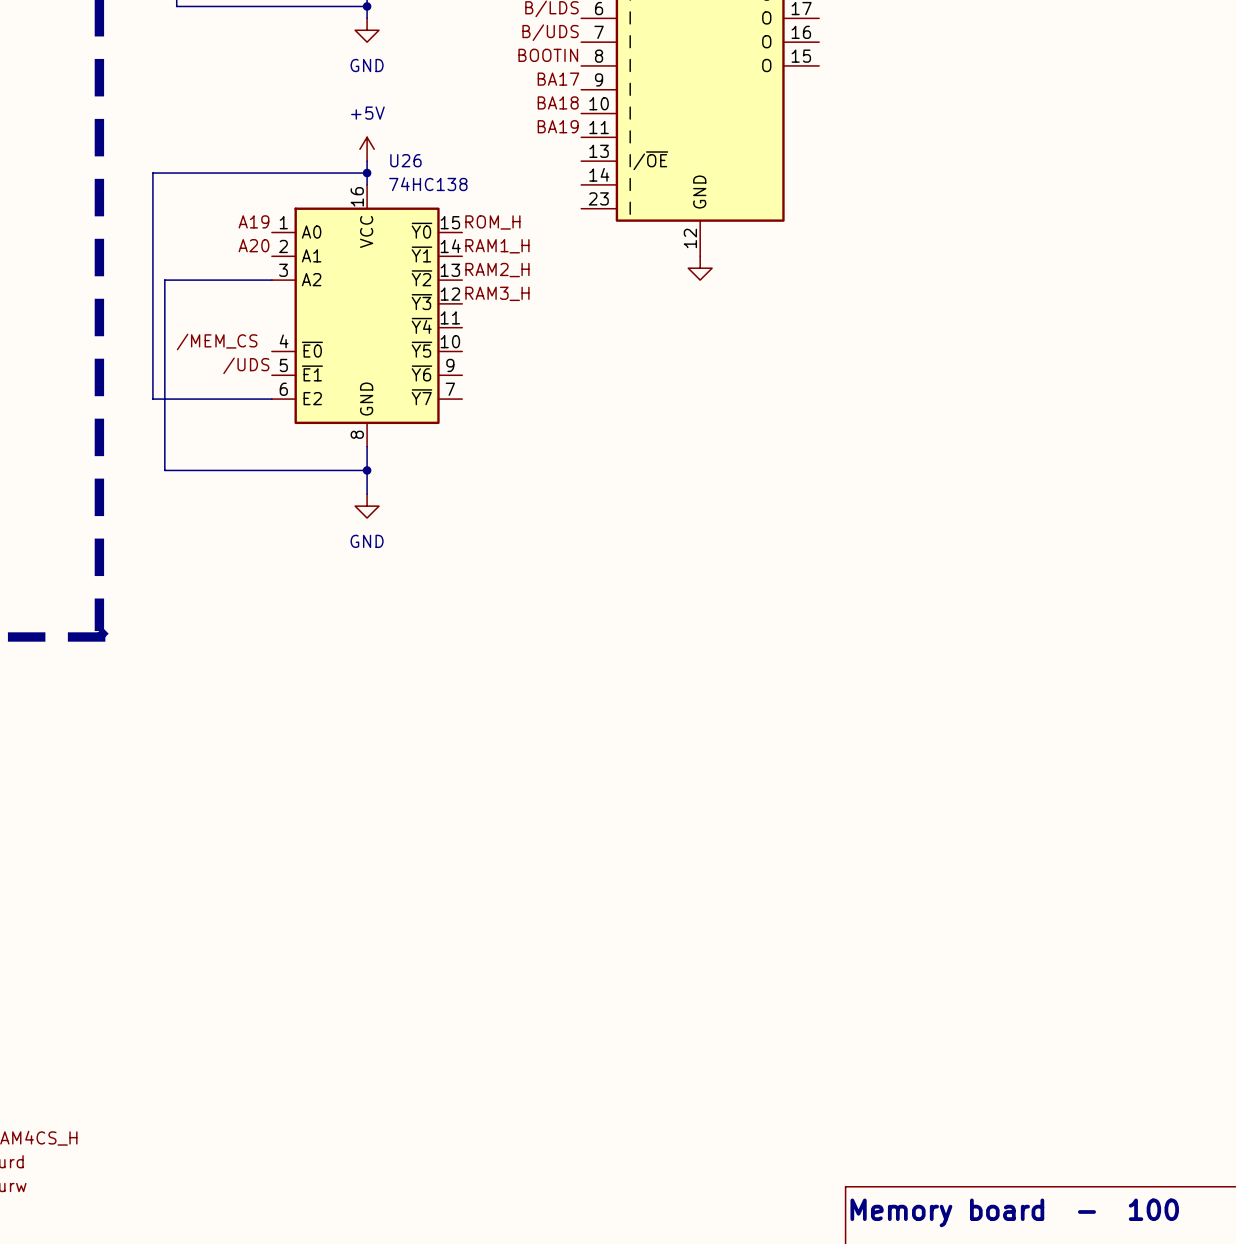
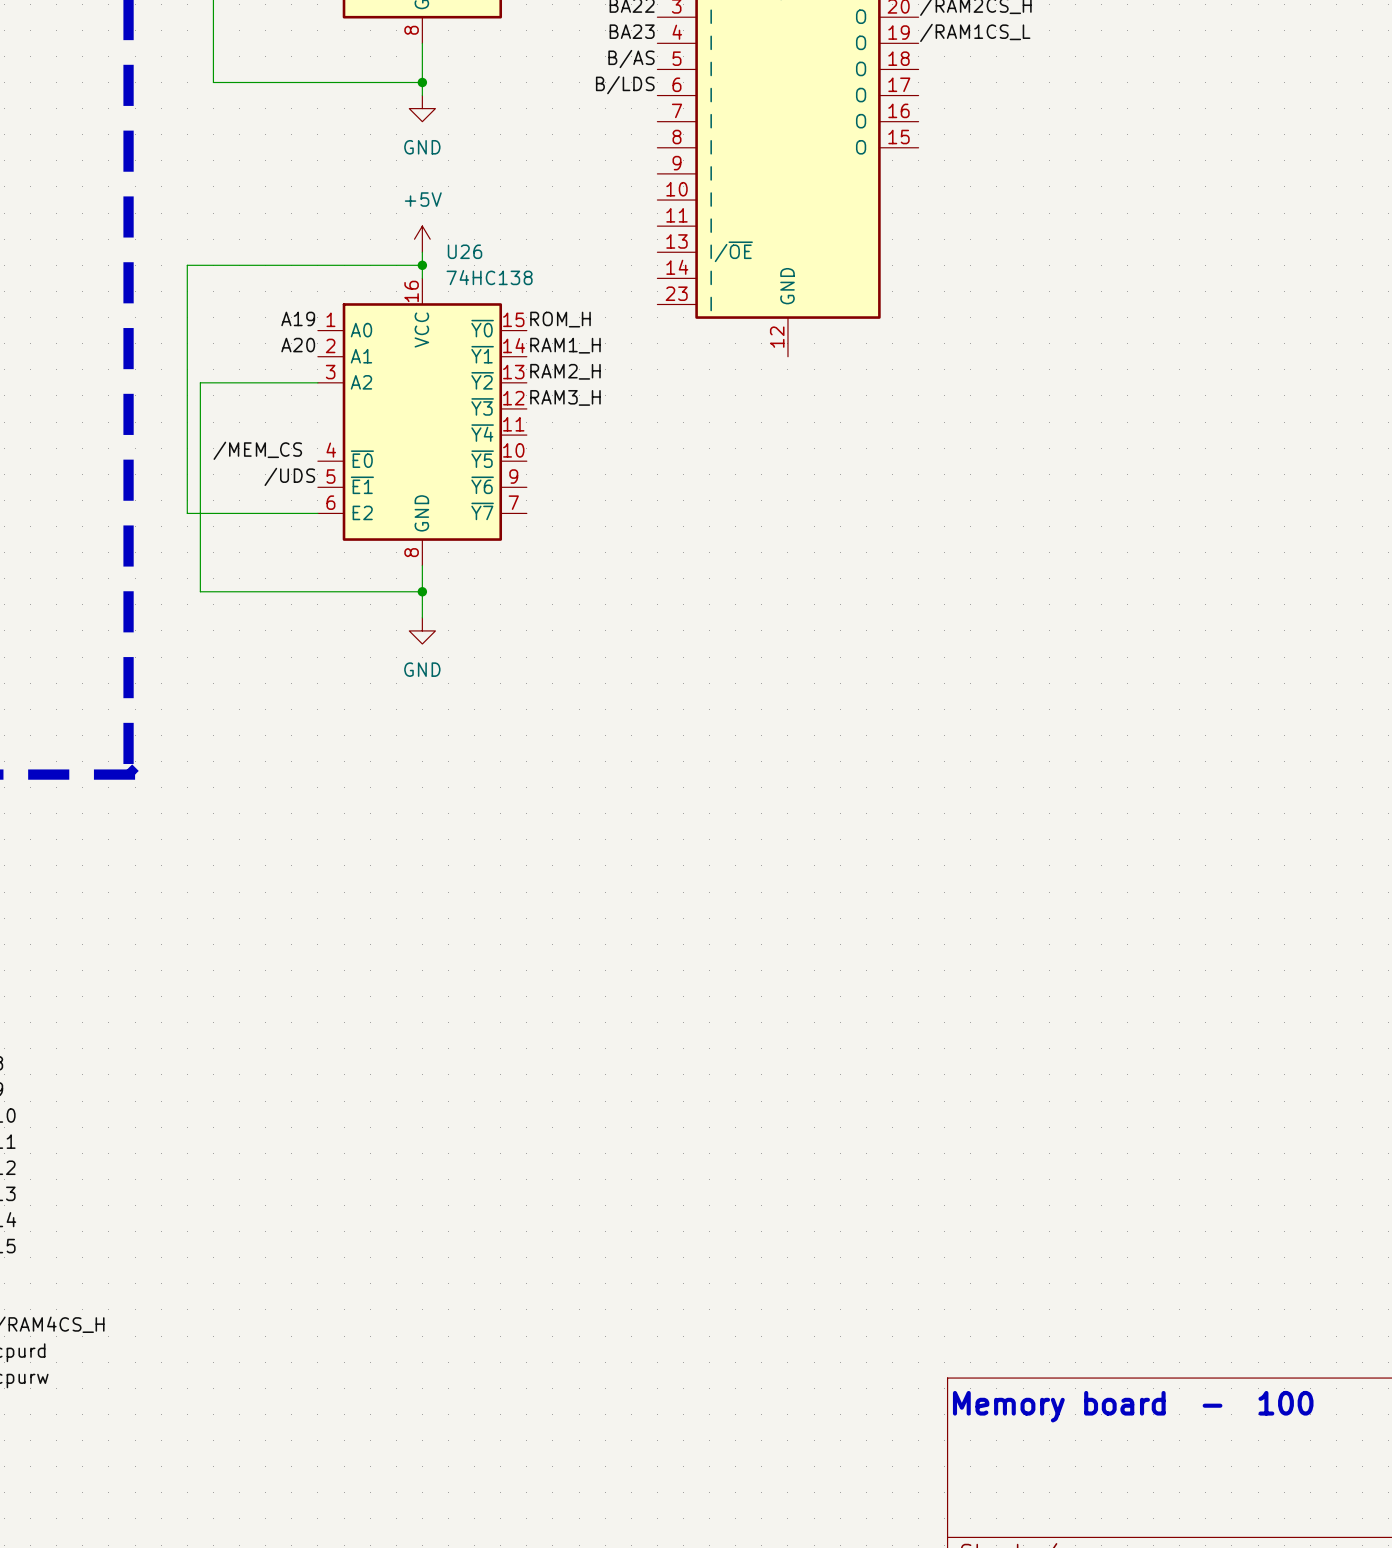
label: B/UDS (550, 32) -> none
label: BOOTIN (548, 55) -> none
label: BA17 (558, 79) -> none
label: BA18 (558, 102) -> none
label: BA19 (558, 126) -> none
power symbol: (700, 268) -> none

